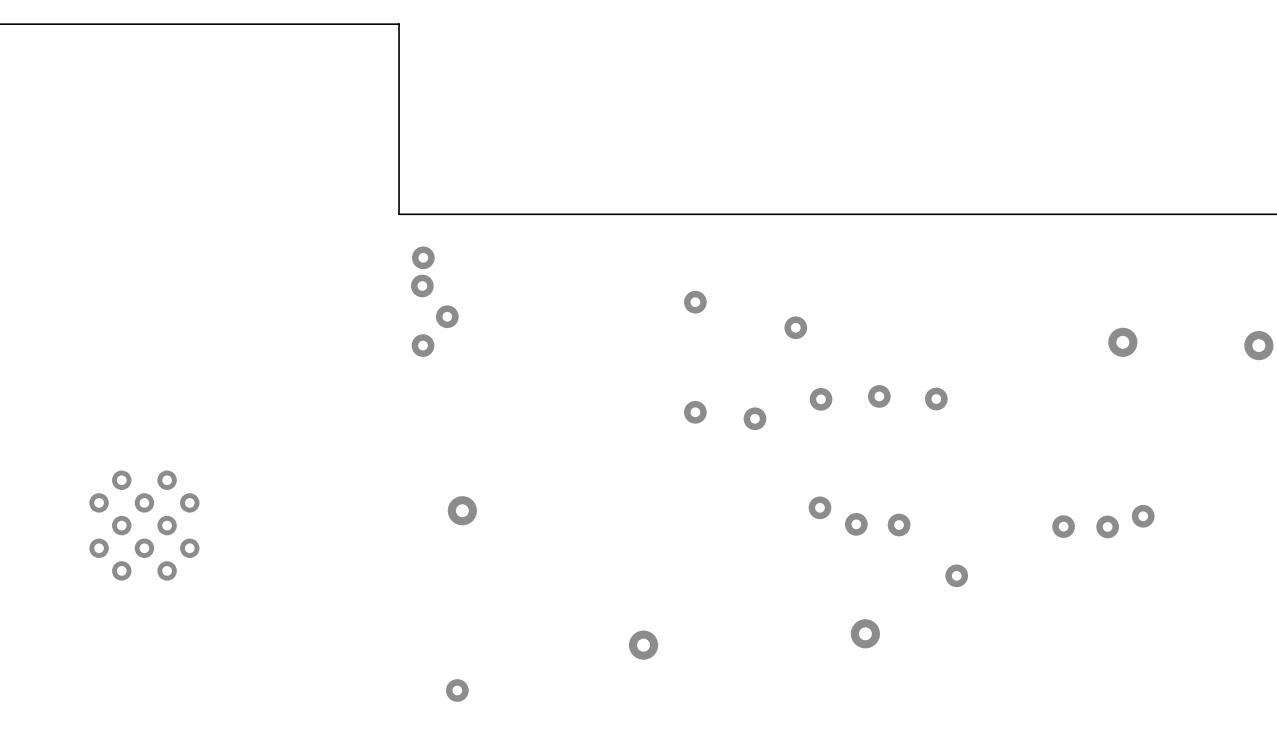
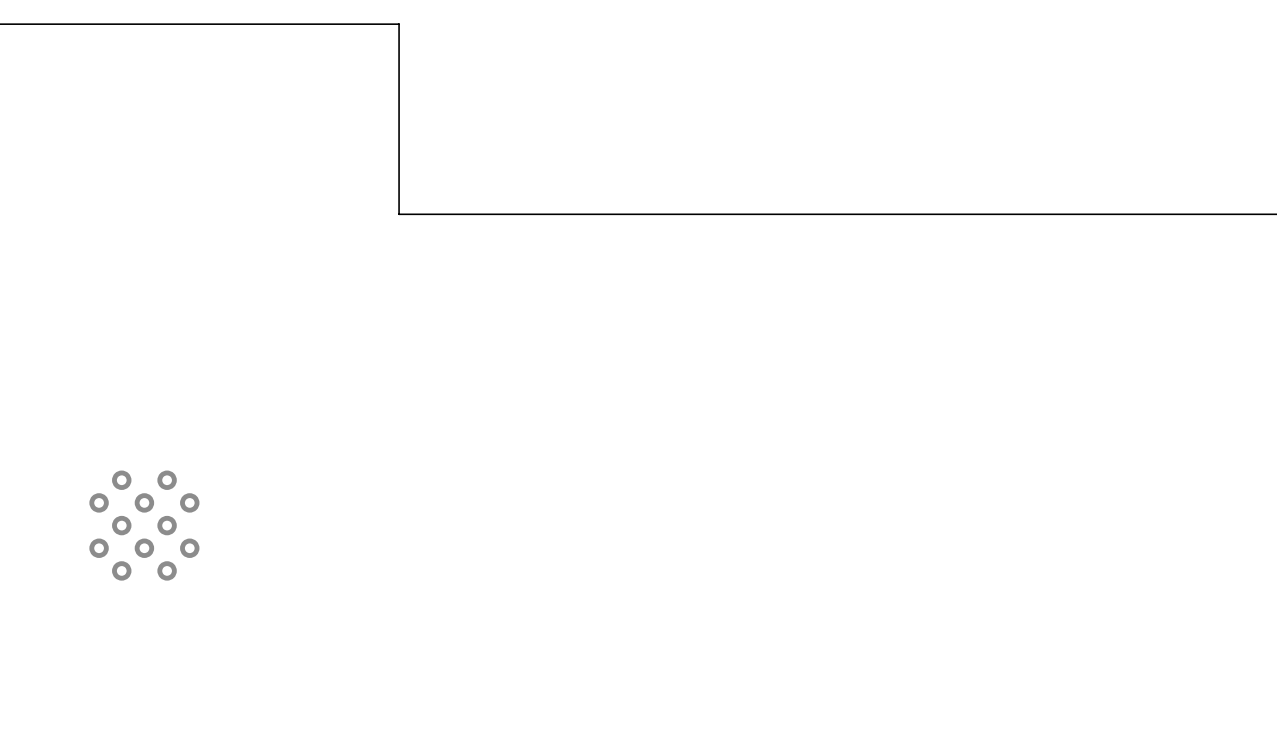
via: (423, 257) -> none
via: (422, 285) -> none
via: (695, 302) -> none
via: (447, 316) -> none
via: (795, 327) -> none
via: (1122, 342) -> none
via: (423, 345) -> none
via: (1258, 345) -> none
via: (879, 396) -> none
via: (821, 399) -> none
via: (936, 399) -> none
via: (695, 412) -> none
via: (754, 418) -> none
via: (819, 507) -> none
via: (462, 510) -> none
via: (1143, 516) -> none
via: (856, 524) -> none
via: (899, 524) -> none
via: (1063, 526) -> none
via: (1107, 526) -> none
via: (956, 575) -> none
via: (865, 633) -> none
via: (643, 645) -> none
via: (457, 690) -> none

